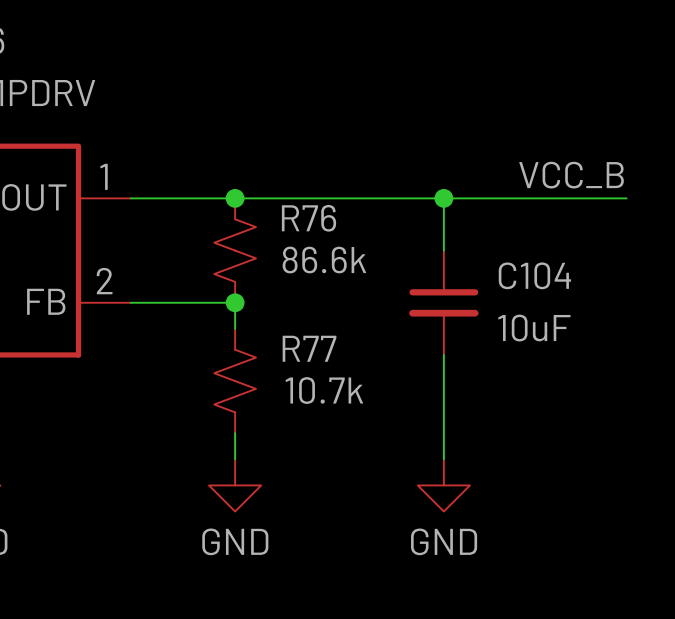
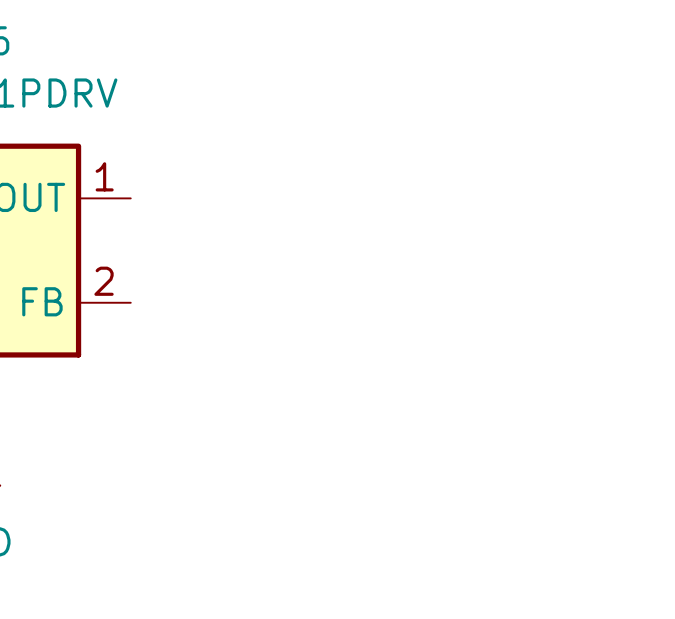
label: VCC_B (571, 175) -> none
wire: (130, 198) (626, 198) -> none
junction: (235, 198) -> none
wire: (443, 198) (443, 250) -> none
junction: (443, 198) -> none
R76: 86.6k (235, 250) -> none
wire: (130, 302) (235, 302) (235, 328) -> none
junction: (235, 302) -> none
C104: 10uF (443, 302) -> none
wire: (443, 354) (443, 459) -> none
R77: 10.7k (235, 381) -> none
wire: (235, 433) (235, 459) -> none
power symbol: GND (235, 485) -> none
power symbol: GND (443, 485) -> none

